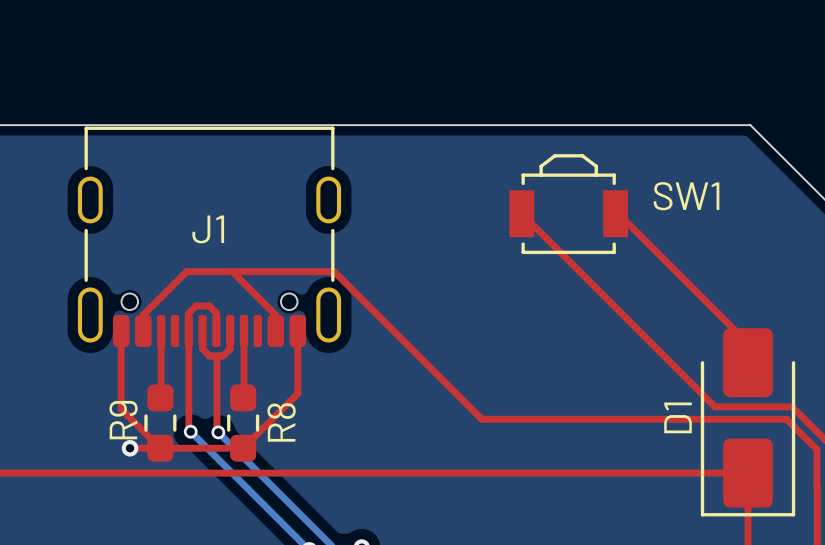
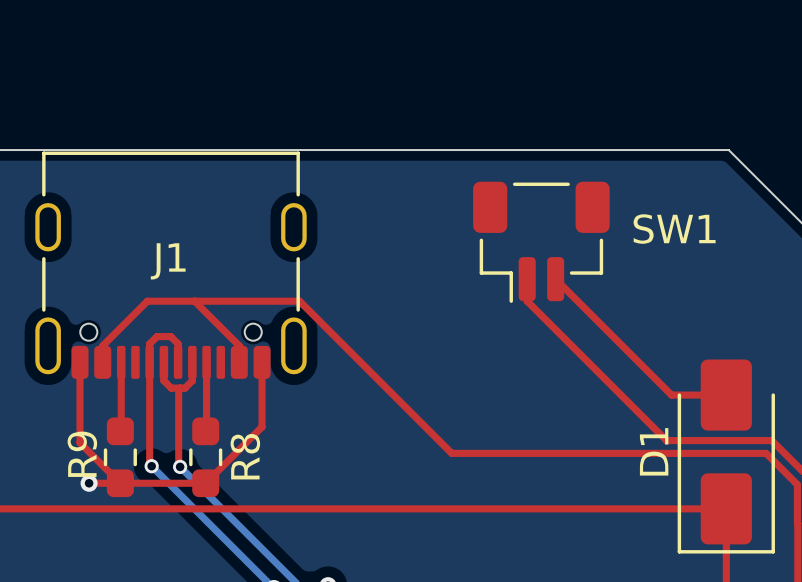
SW1 footprint: [509, 154, 629, 255] -> [473, 181, 610, 303]
top track: (521, 213) (714, 406) -> (527, 279) (527, 301) (666, 440) (692, 440)
top track: (615, 213) (615, 211) (748, 343) -> none
top track: none -> (555, 279) (671, 395) (726, 395)

